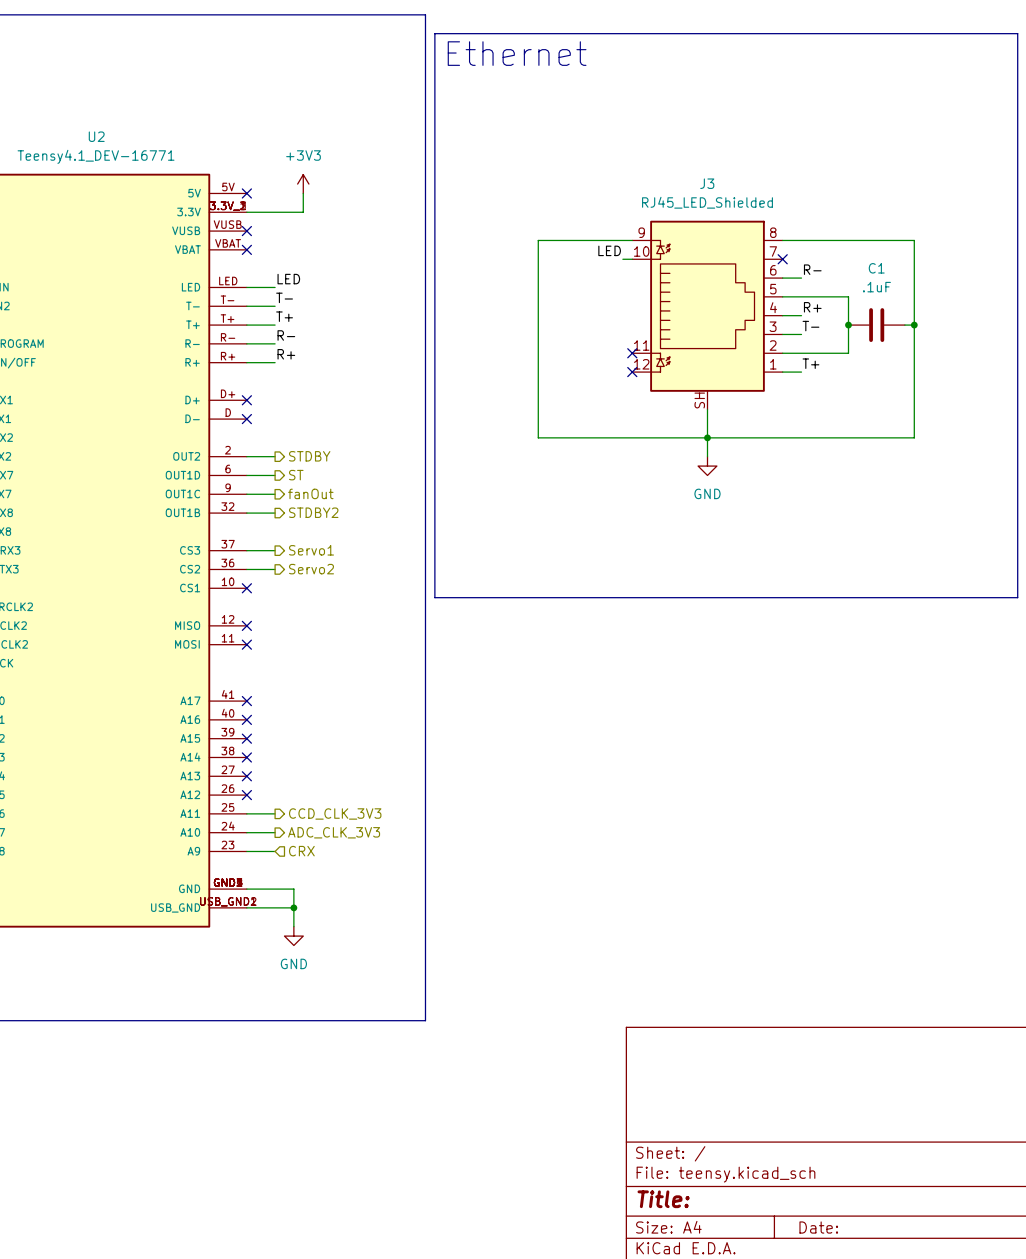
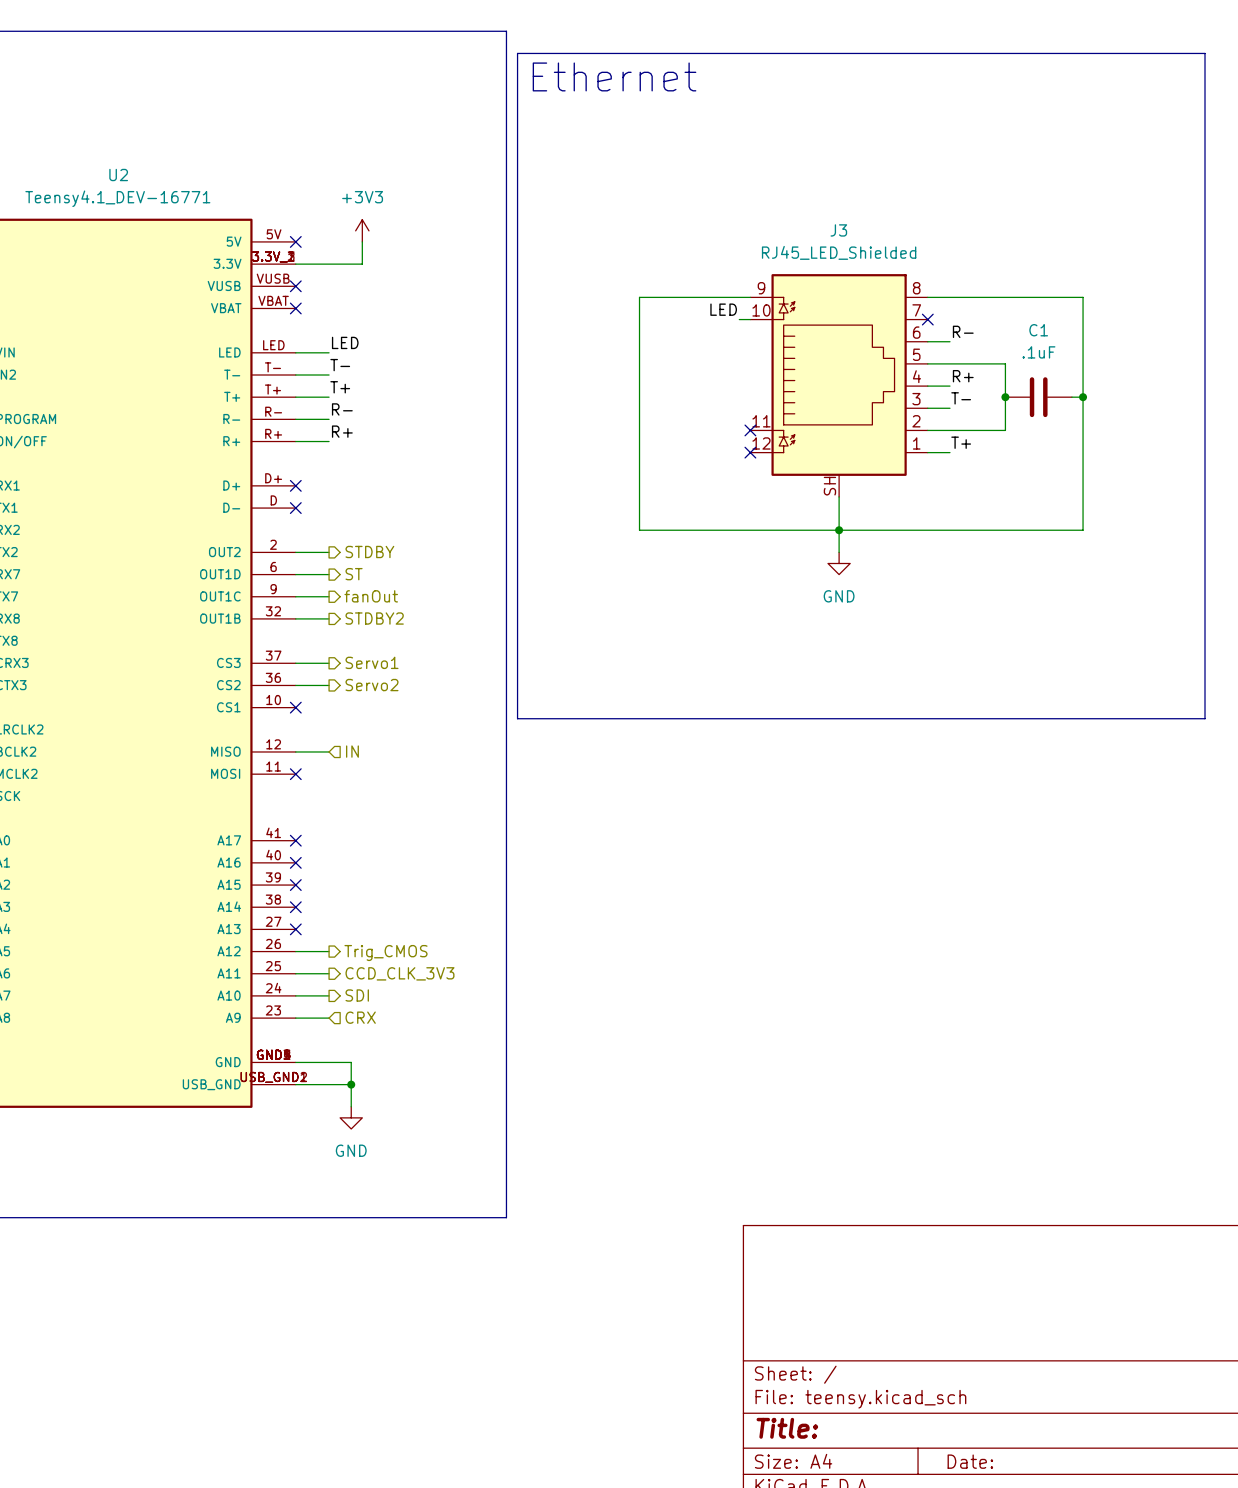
wire: none -> (295, 751) (329, 751)
no-connect mark: (246, 625) -> none
hierarchical label: none -> IN (352, 751)
wire: none -> (295, 951) (329, 951)
no-connect mark: (246, 795) -> none
hierarchical label: none -> Trig_CMOS (385, 953)
hierarchical label: ADC_CLK_3V3 (334, 832) -> SDI (357, 995)

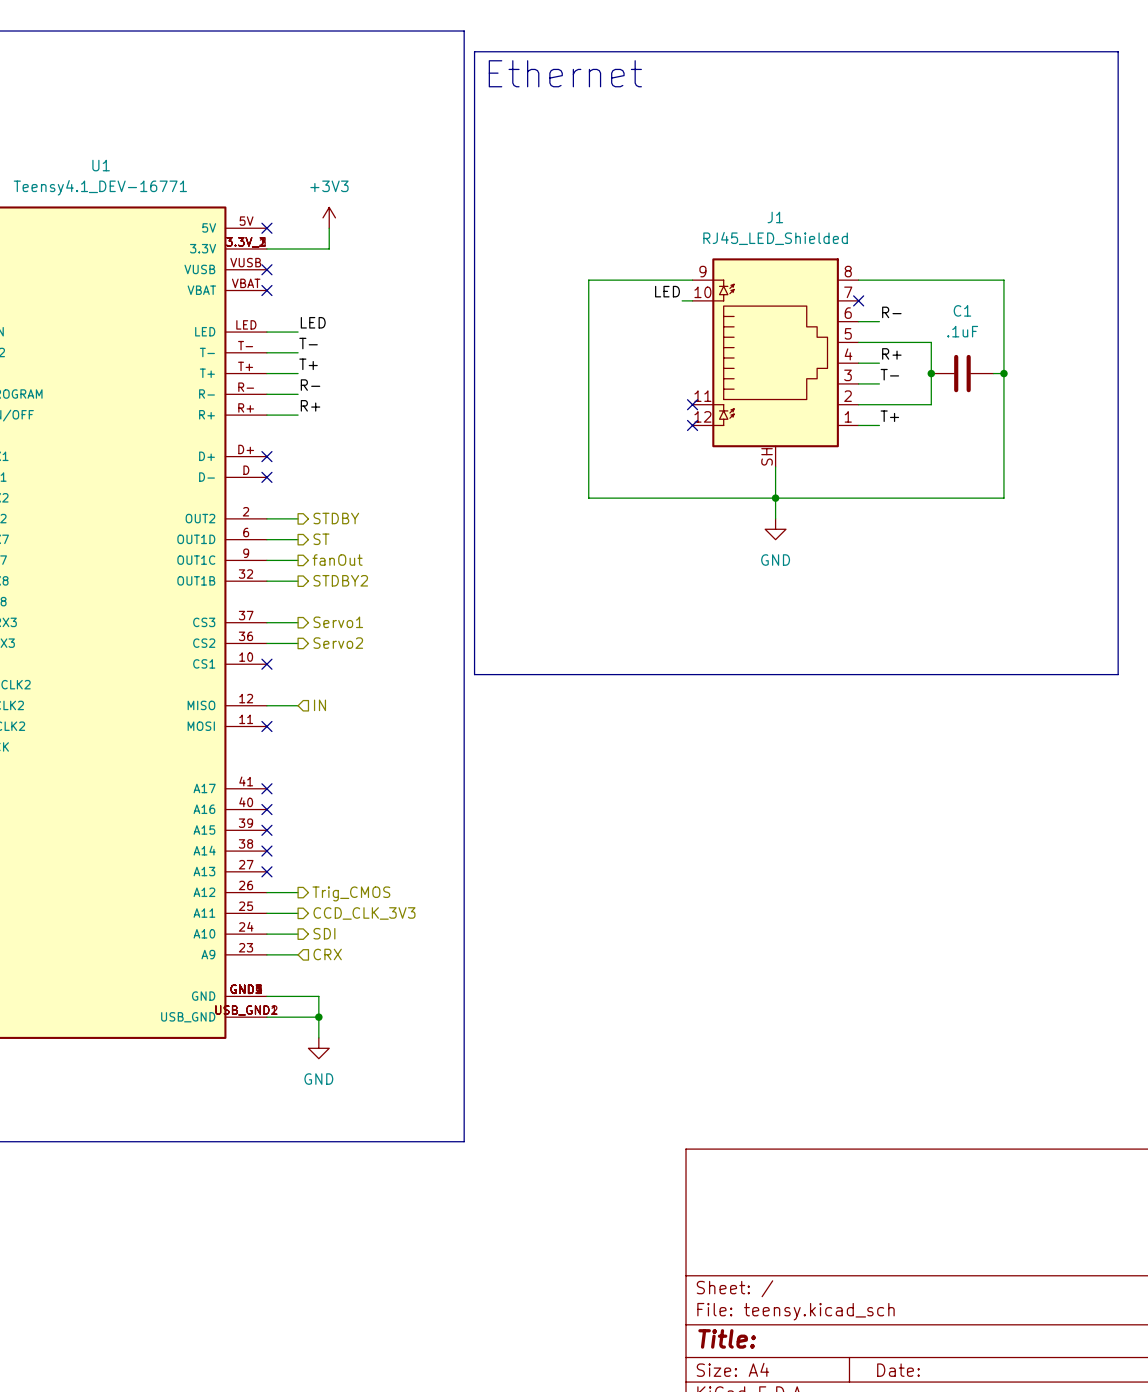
U2 name: U2 (118, 175) -> U1 (101, 165)
J3 name: J3 (838, 230) -> J1 (775, 217)

